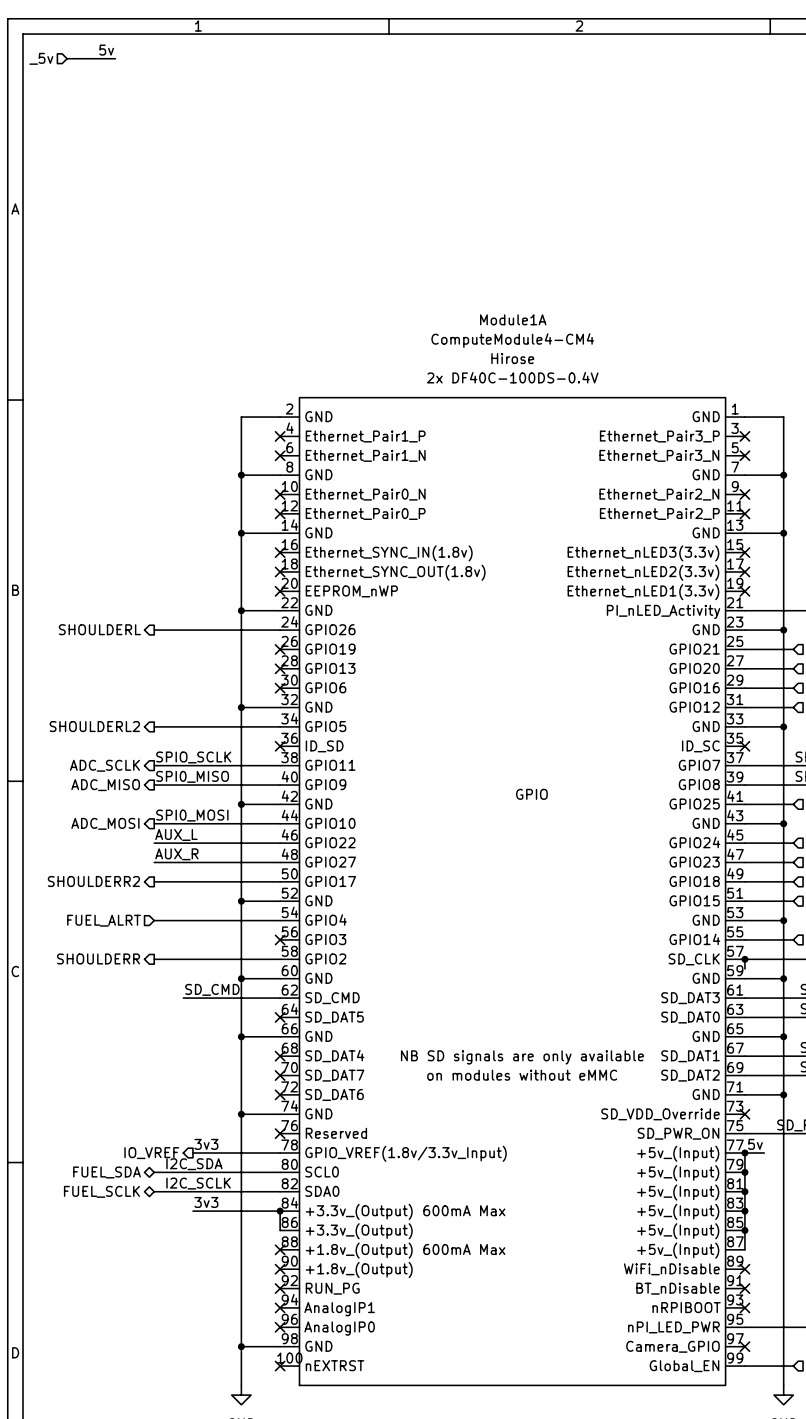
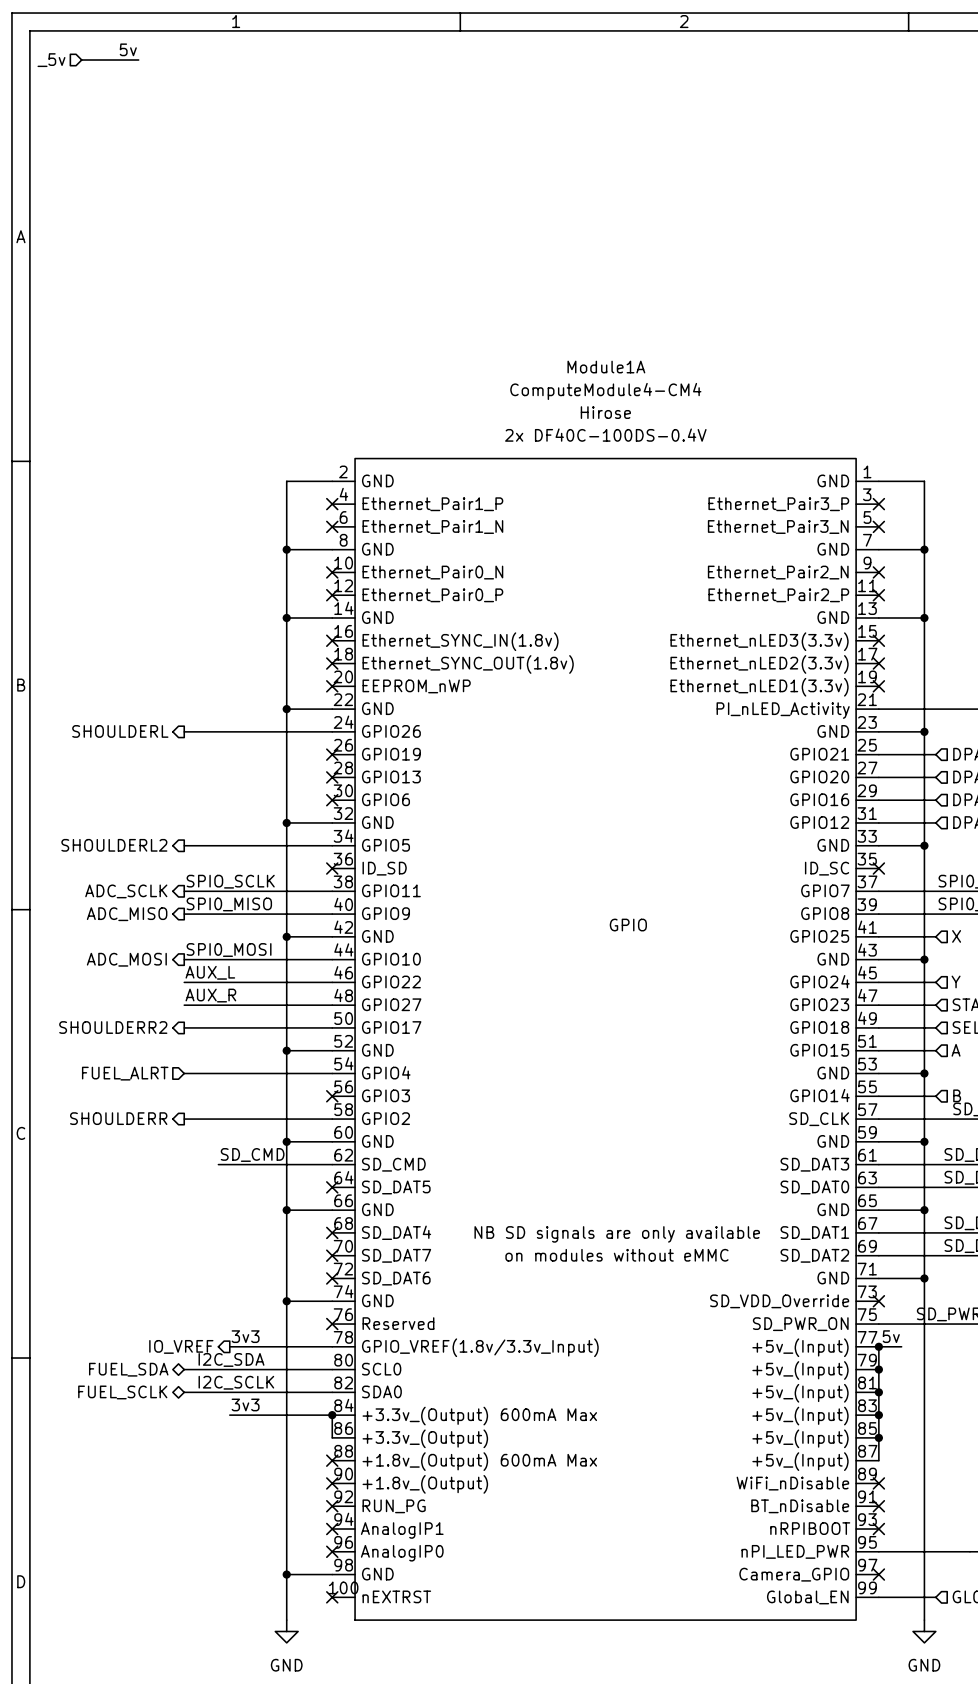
wire: (744, 959) (744, 969) -> none
junction: (744, 959) -> none

